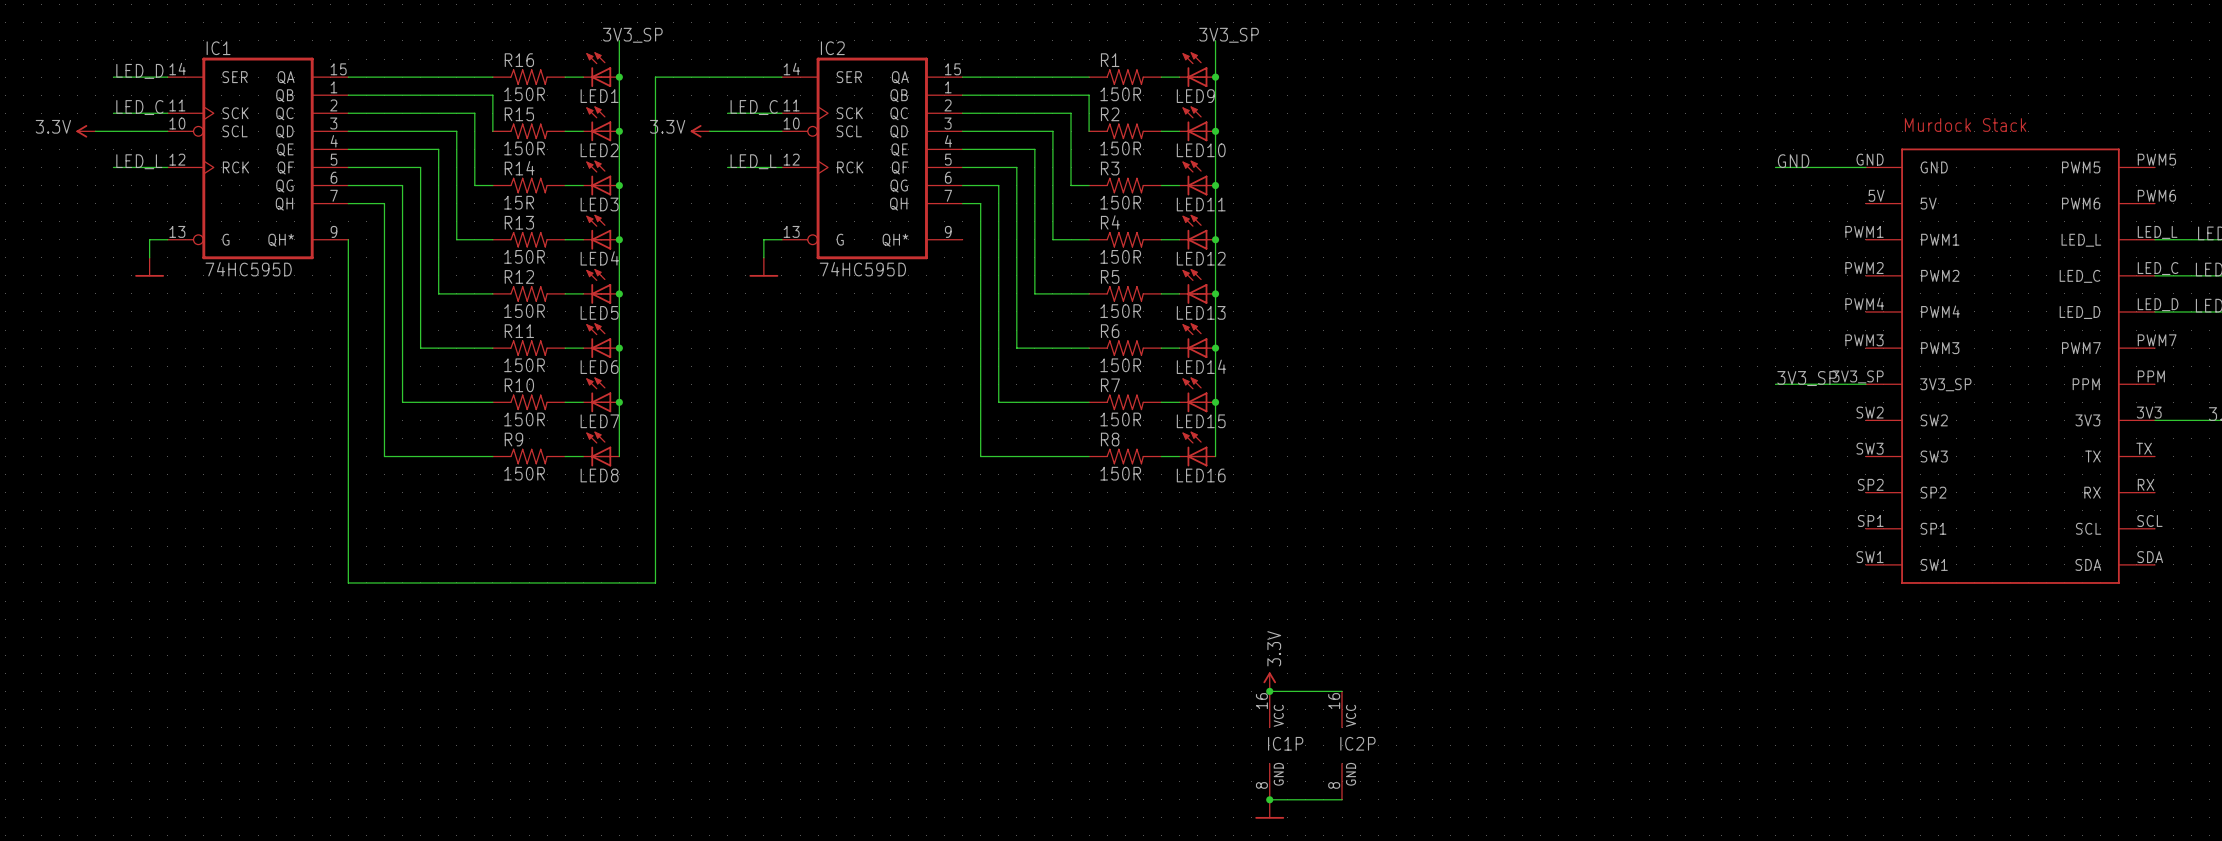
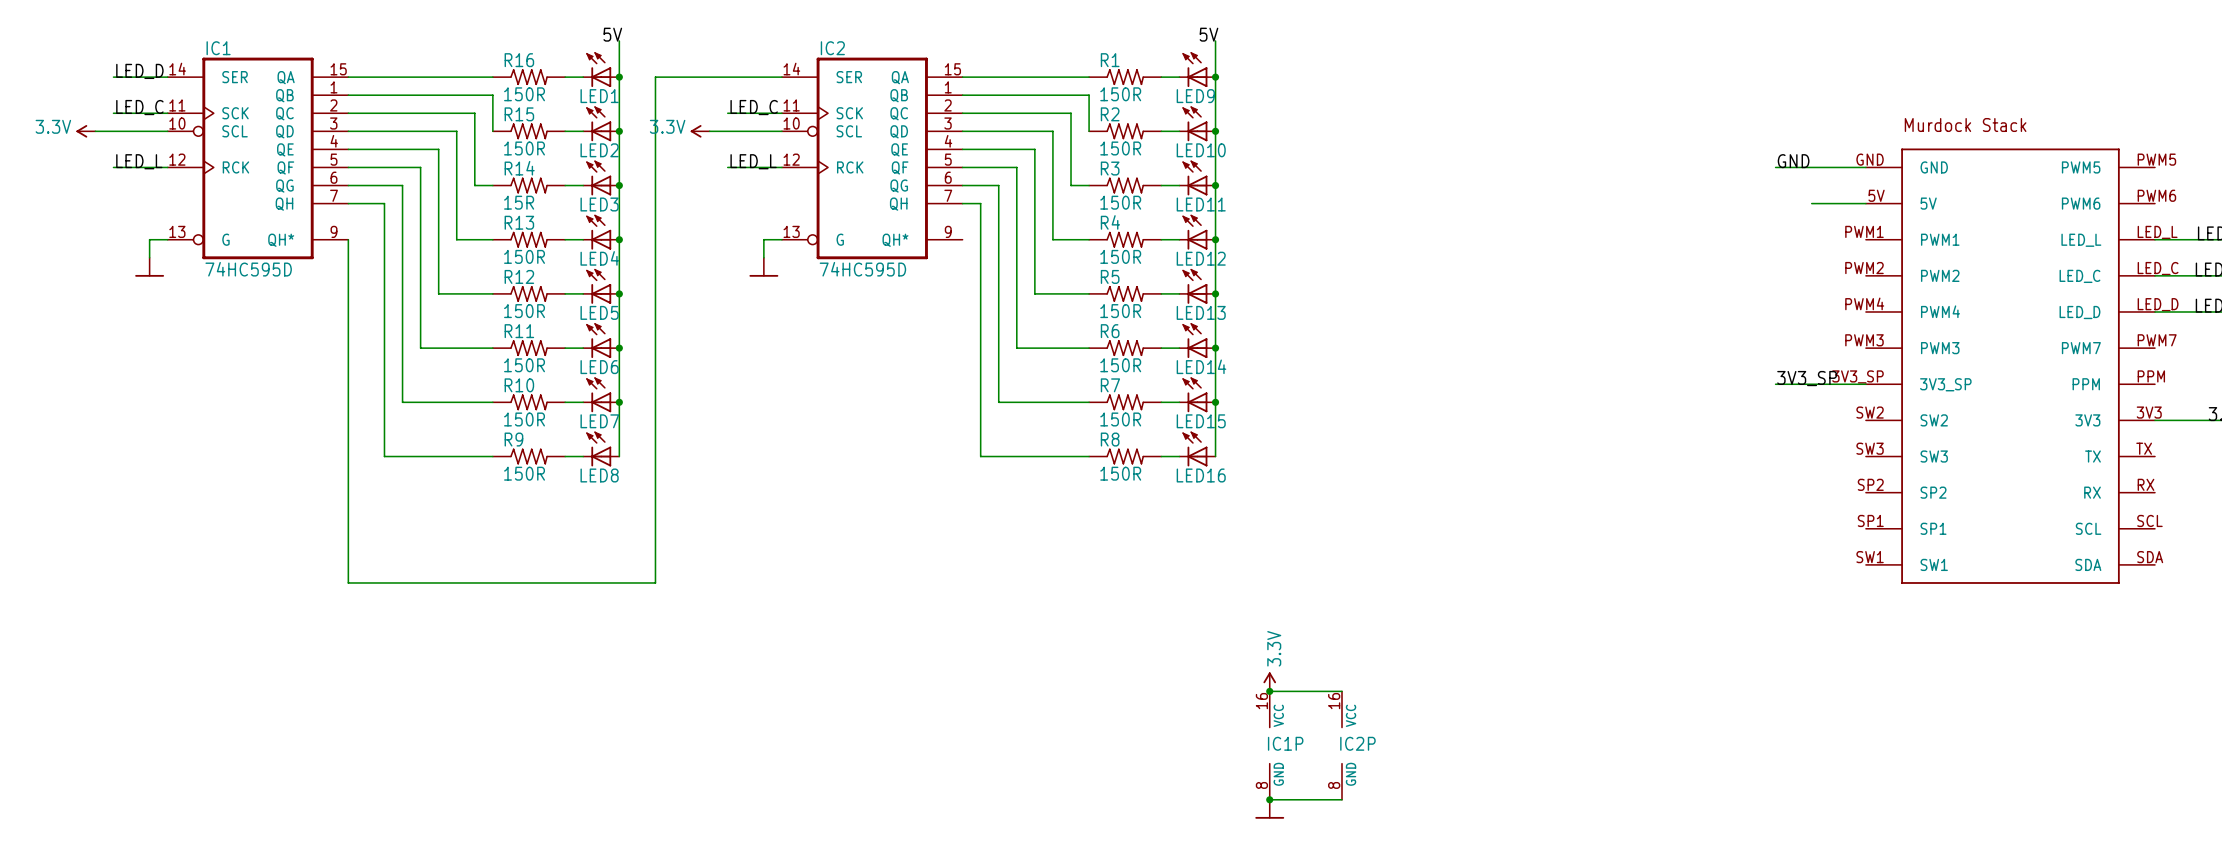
label: 3V3_SP (632, 35) -> 5V (612, 34)
label: 3V3_SP (1229, 35) -> 5V (1208, 34)
wire: none -> (1811, 203) (1865, 203)

